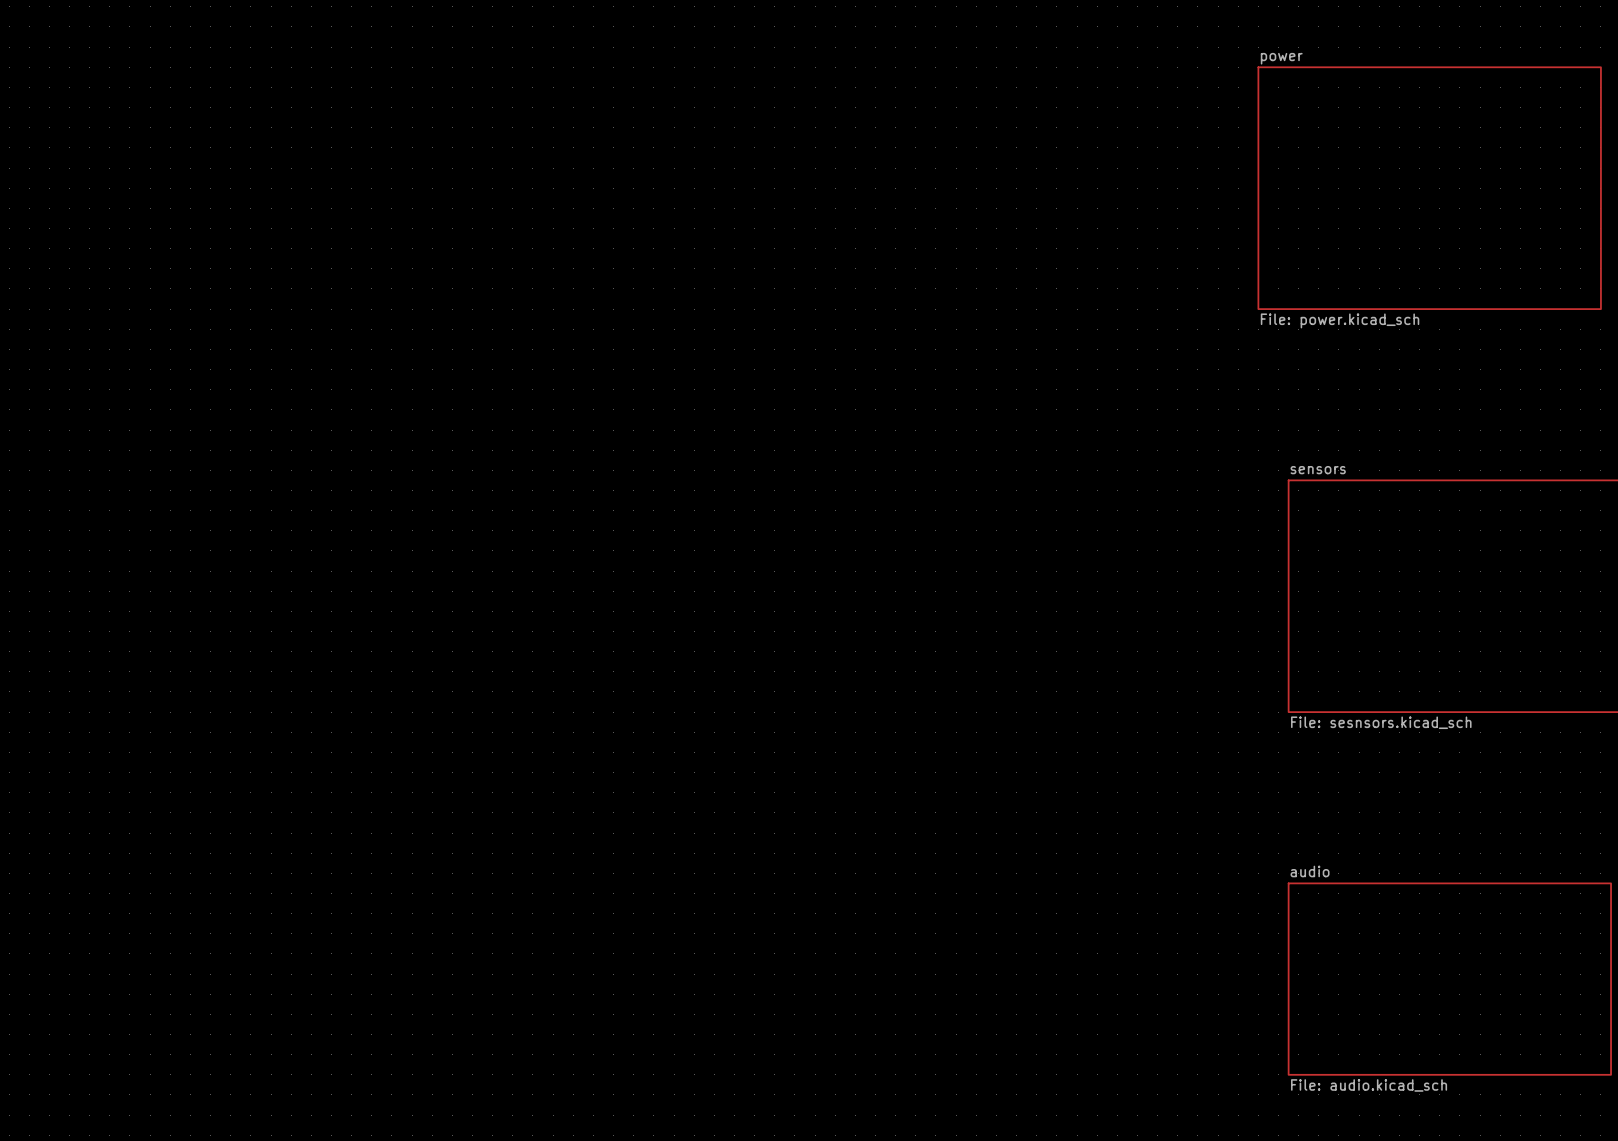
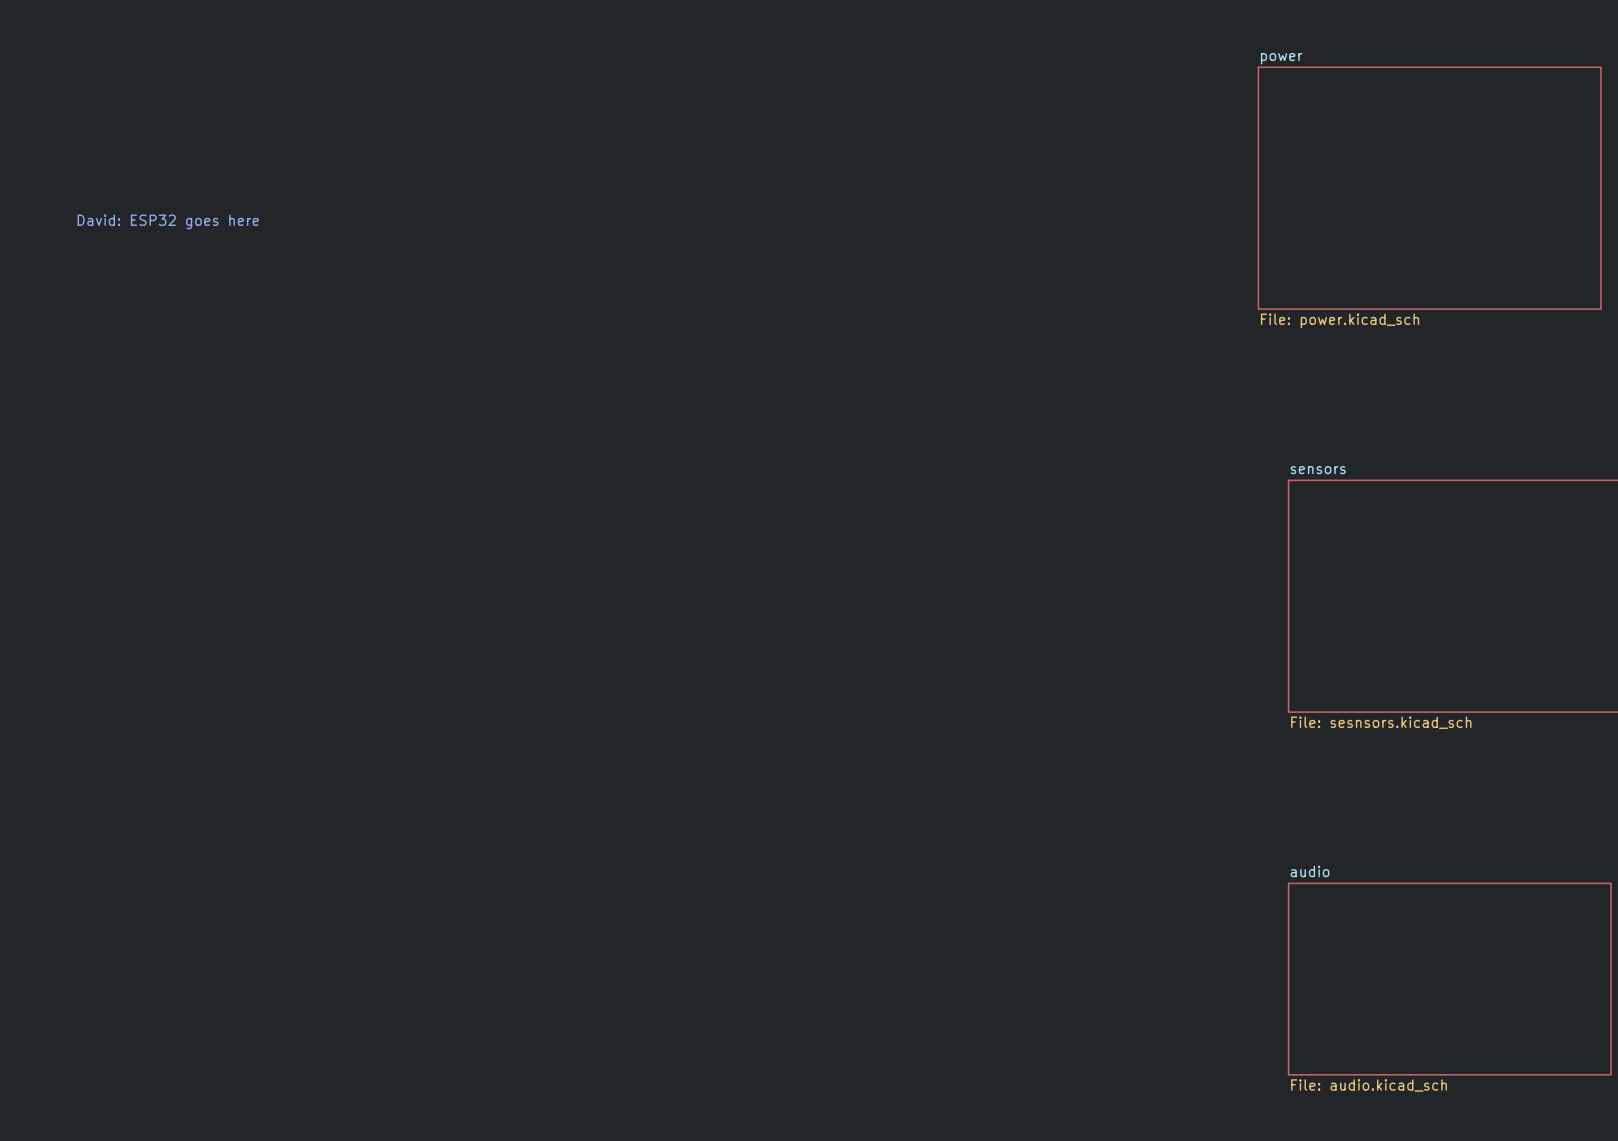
text: none -> David: ESP32 goes here (168, 221)

